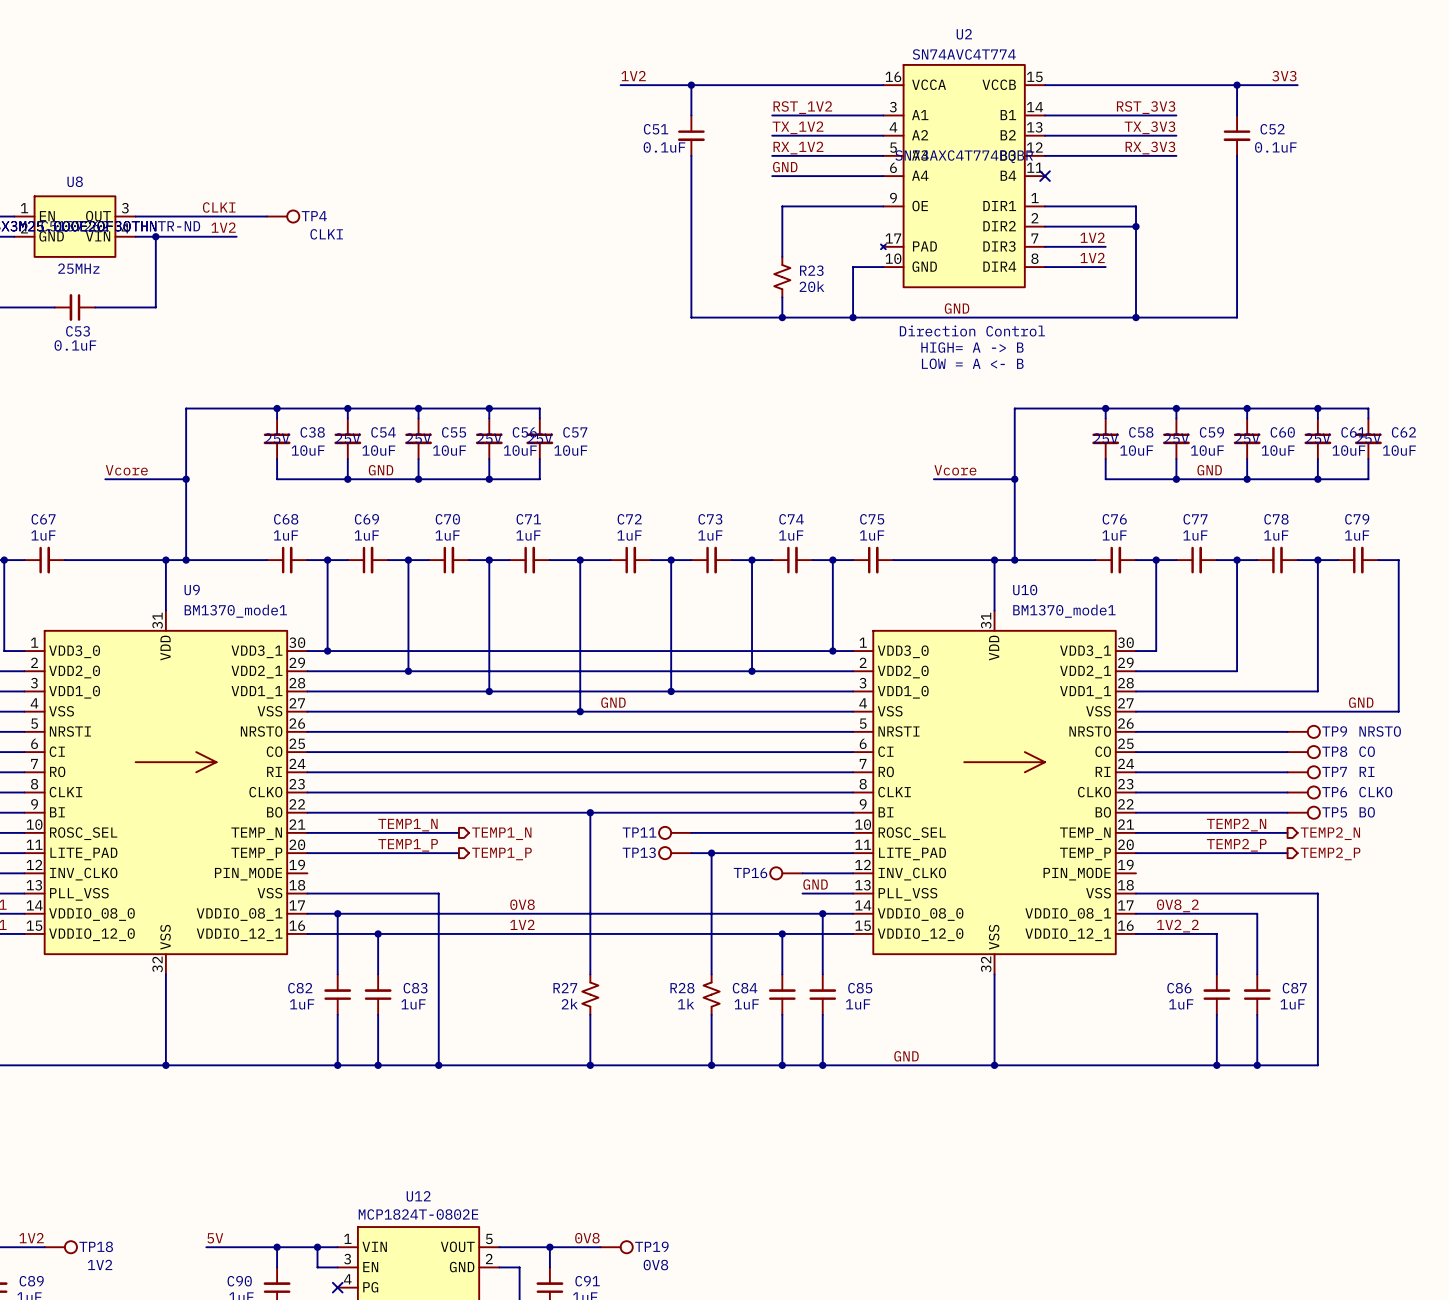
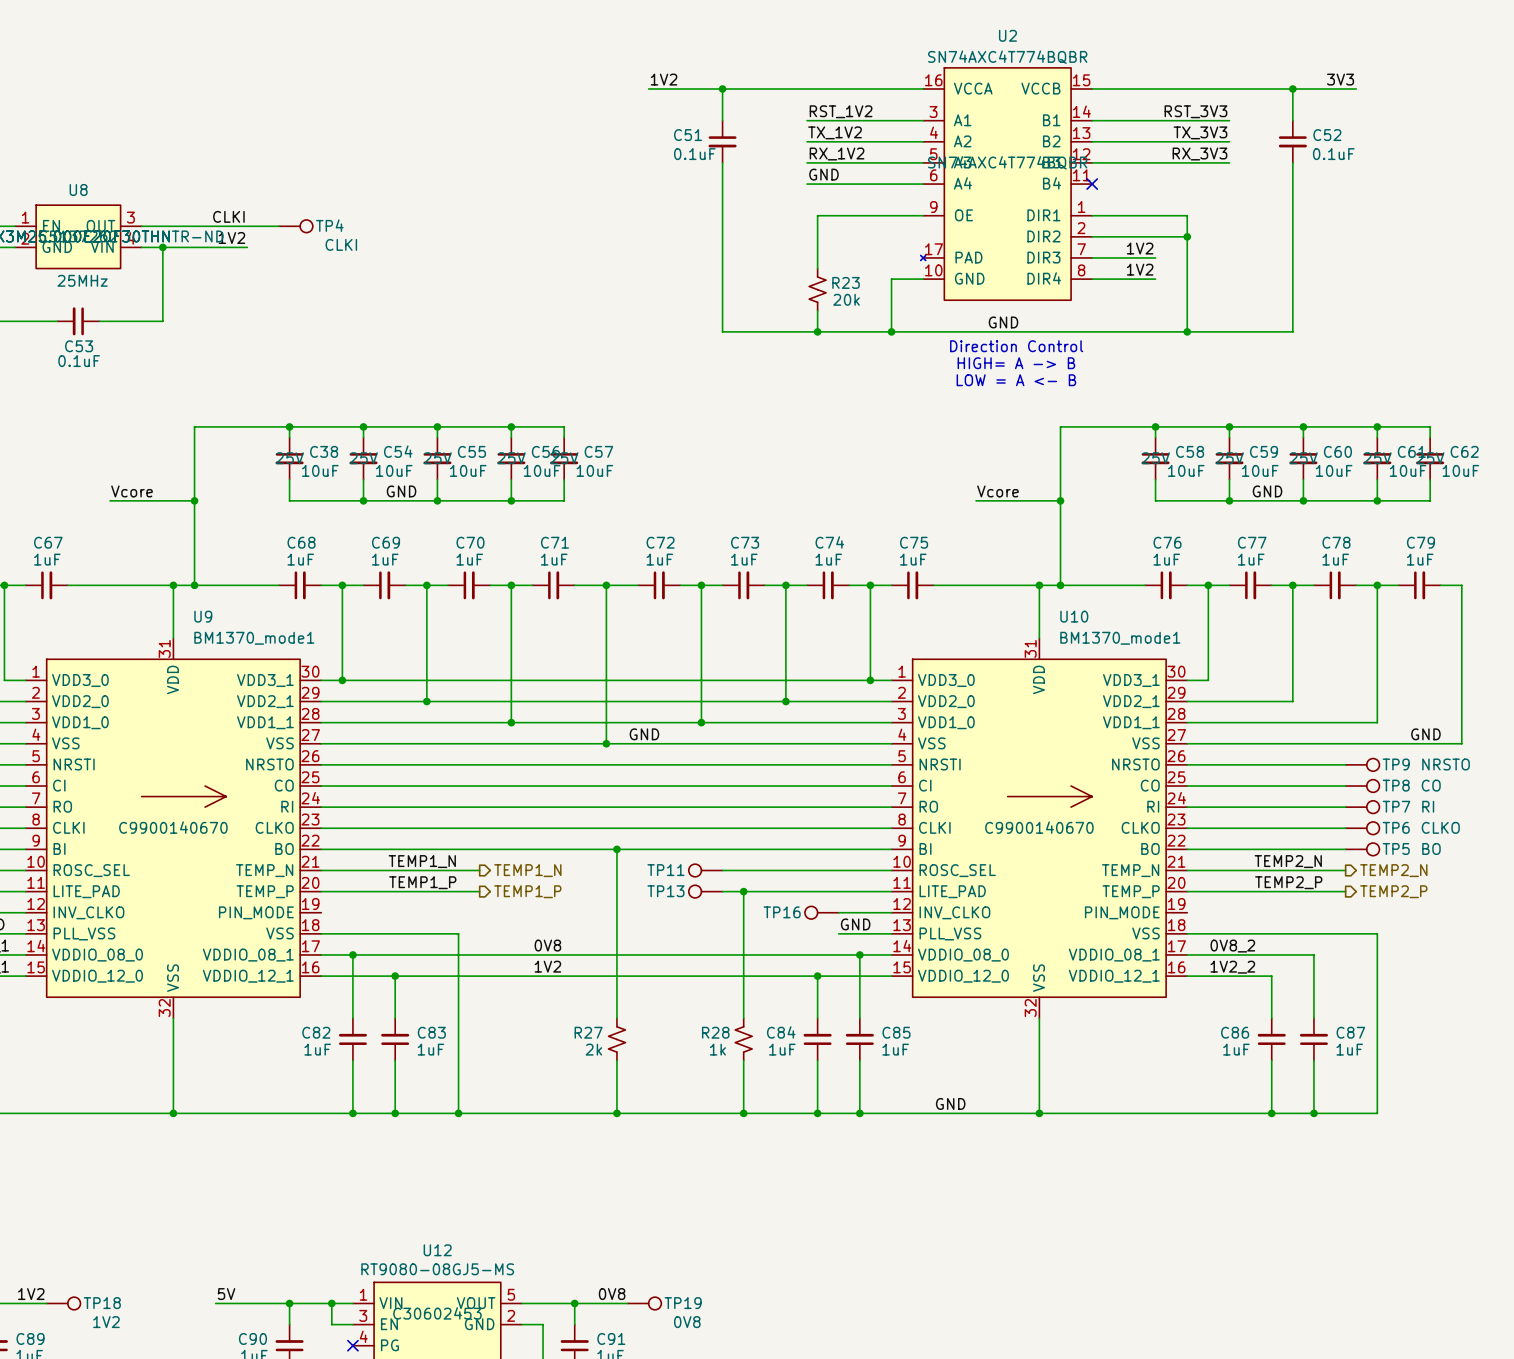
U2 value: SN74AVC4T774 (964, 54) -> SN74AXC4T774BQBR (1007, 57)
U9 text: none -> C9900140670 (173, 827)
U10 text: none -> C9900140670 (1039, 827)
U12 value: MCP1824T-0802E (418, 1214) -> RT9080-08GJ5-MS (437, 1269)
U12 text: none -> C30602453 (437, 1313)

